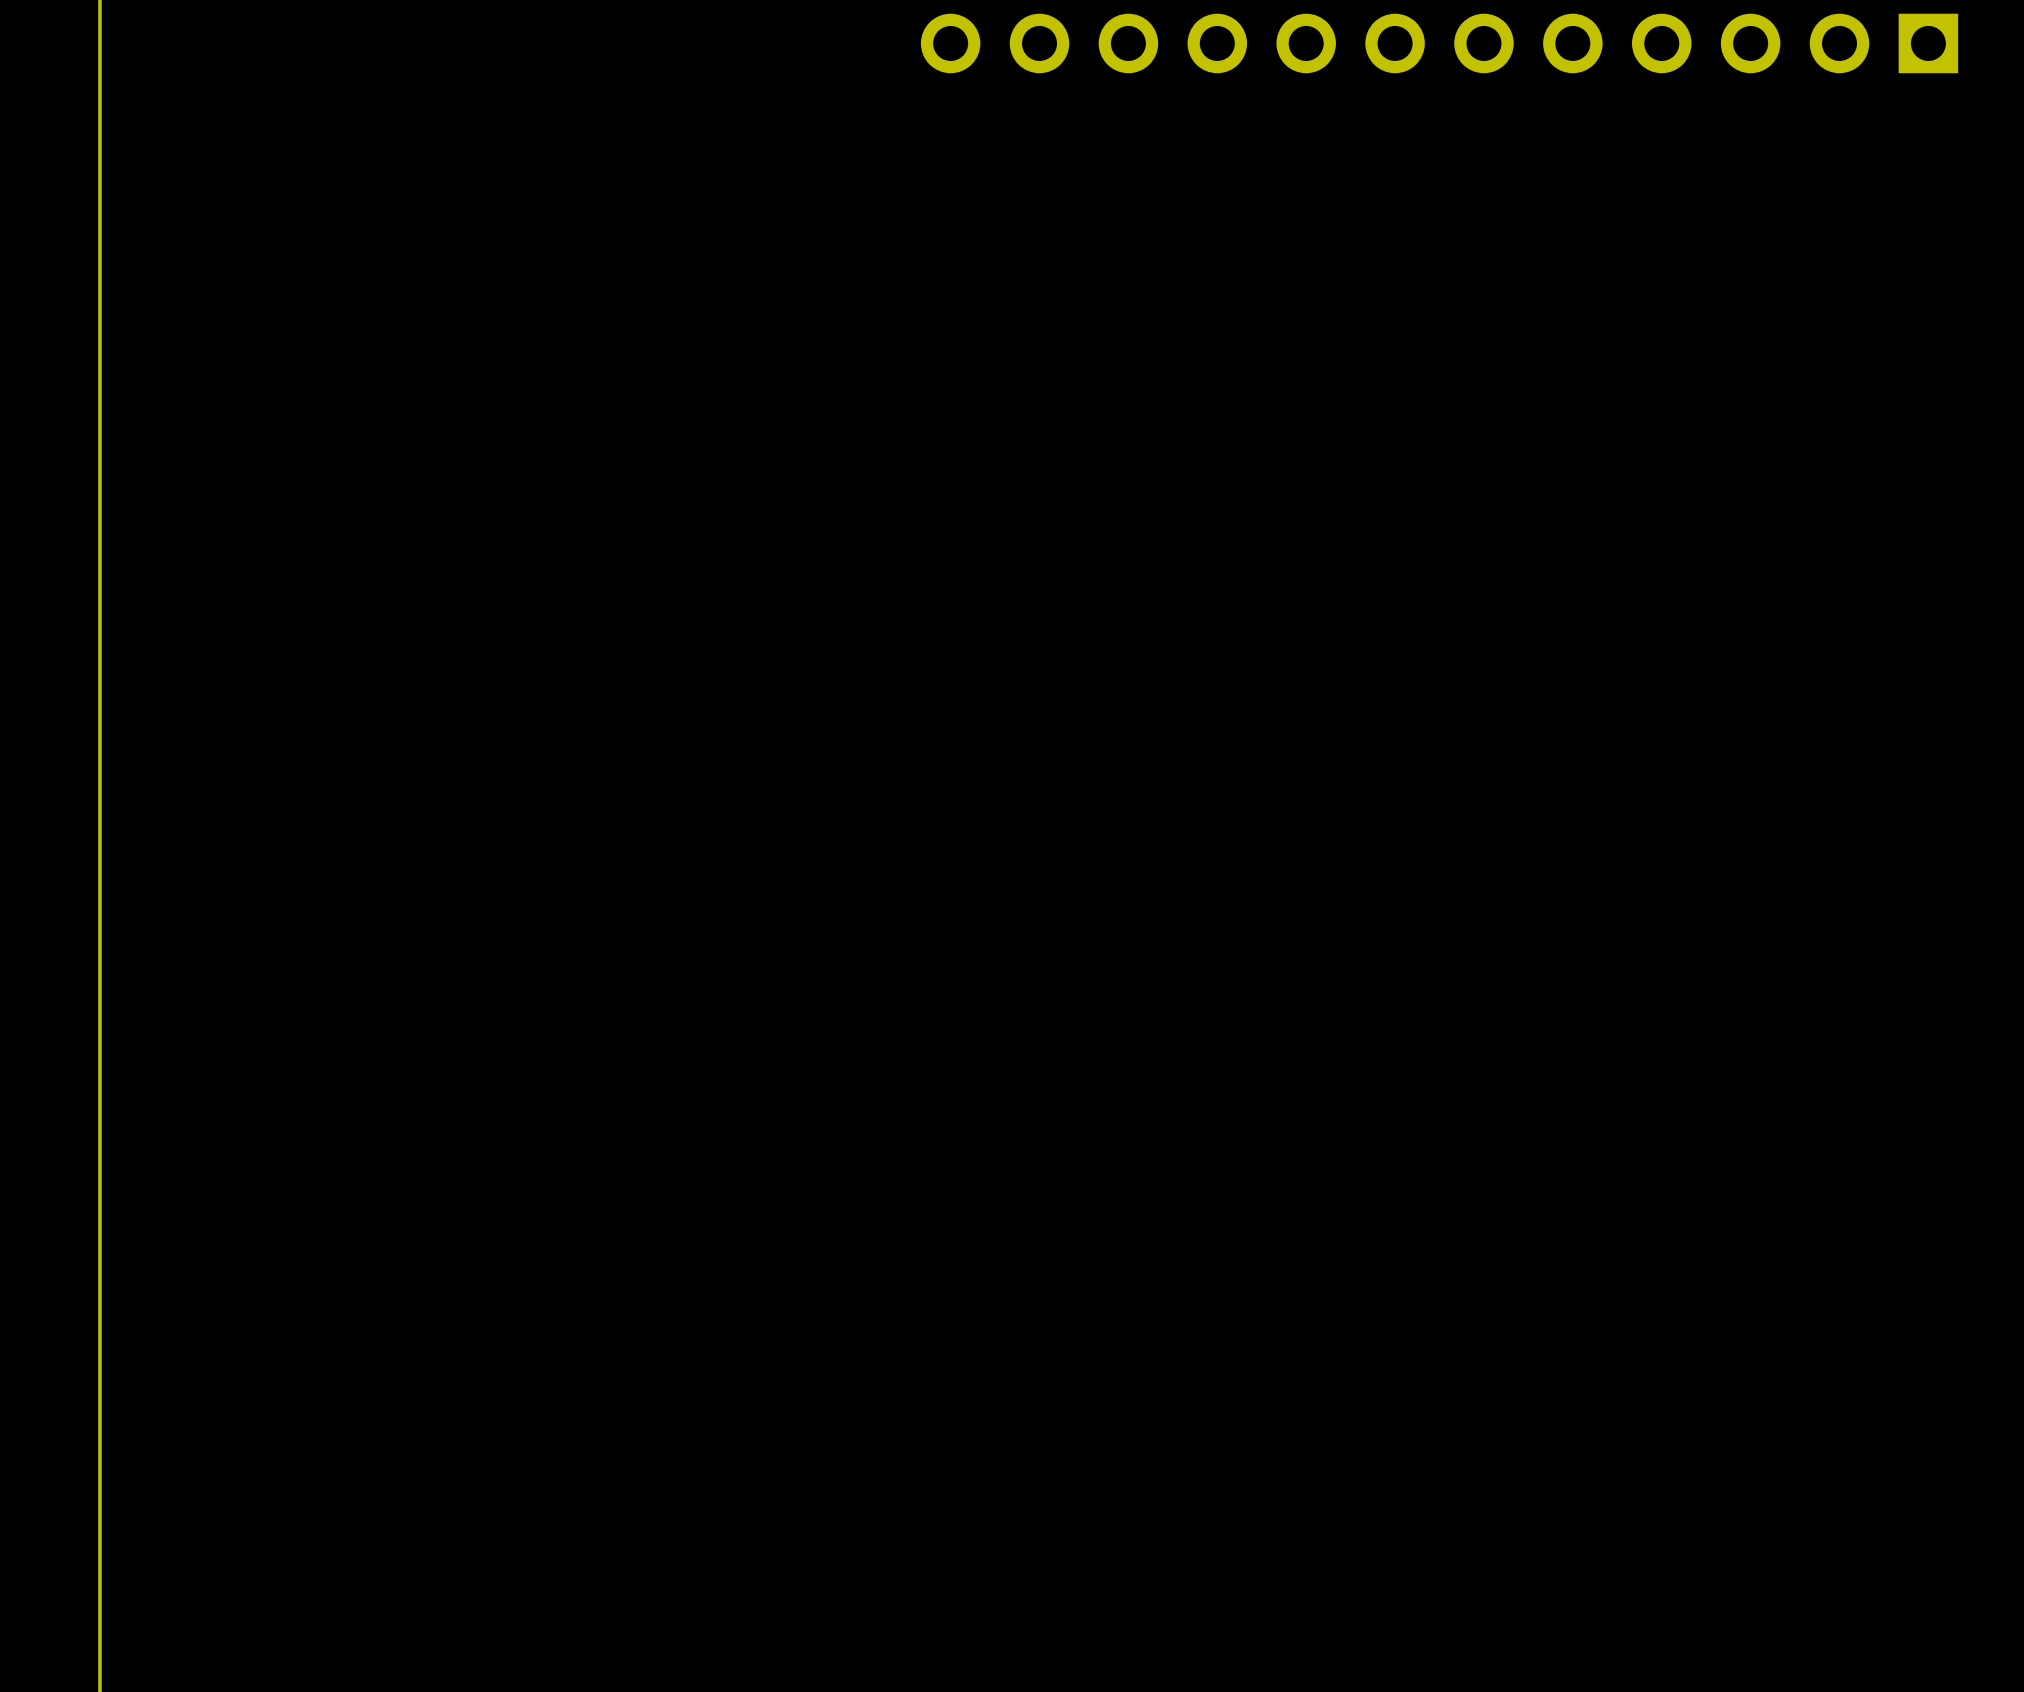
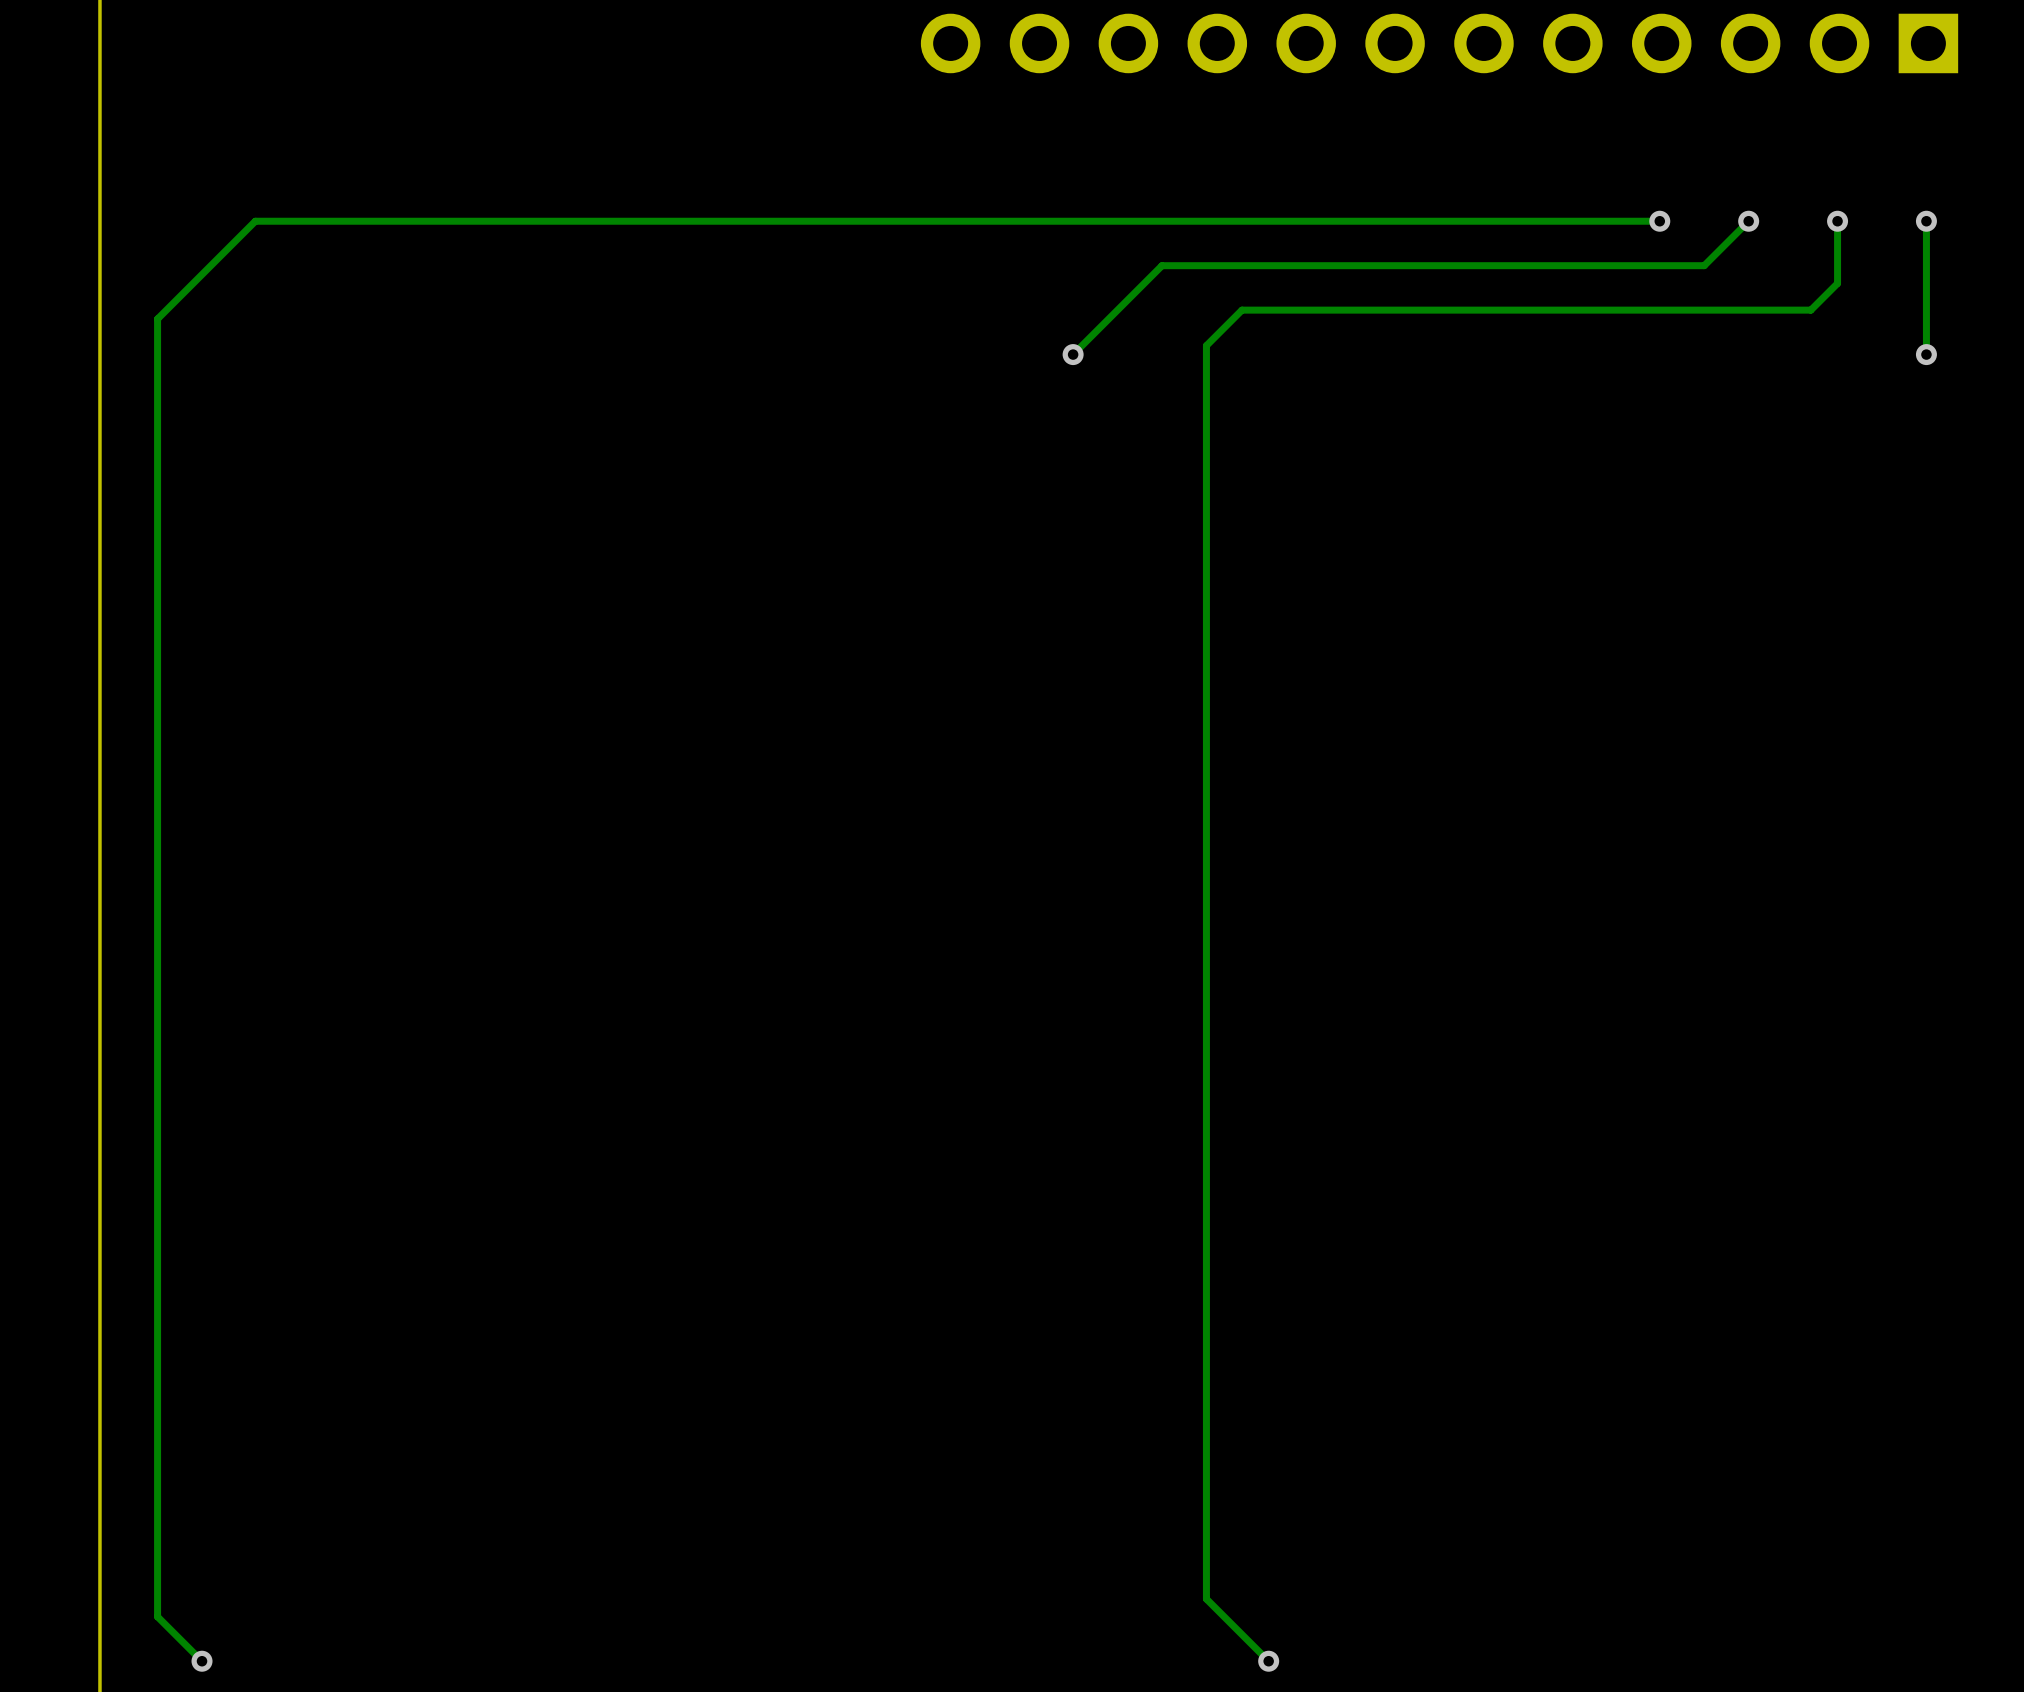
track: none -> (1659, 221) (255, 221) (157, 319) (157, 1616) (202, 1661)
via: none -> (1659, 221)
track: none -> (1748, 221) (1704, 265) (1162, 265) (1073, 354)
via: none -> (1748, 221)
track: none -> (1837, 221) (1837, 283) (1810, 310) (1242, 310) (1206, 345) (1206, 1599) (1268, 1661)
via: none -> (1837, 221)
track: none -> (1926, 221) (1926, 354)
via: none -> (1926, 221)
via: none -> (1073, 354)
via: none -> (1926, 354)
via: none -> (202, 1661)
via: none -> (1268, 1661)

